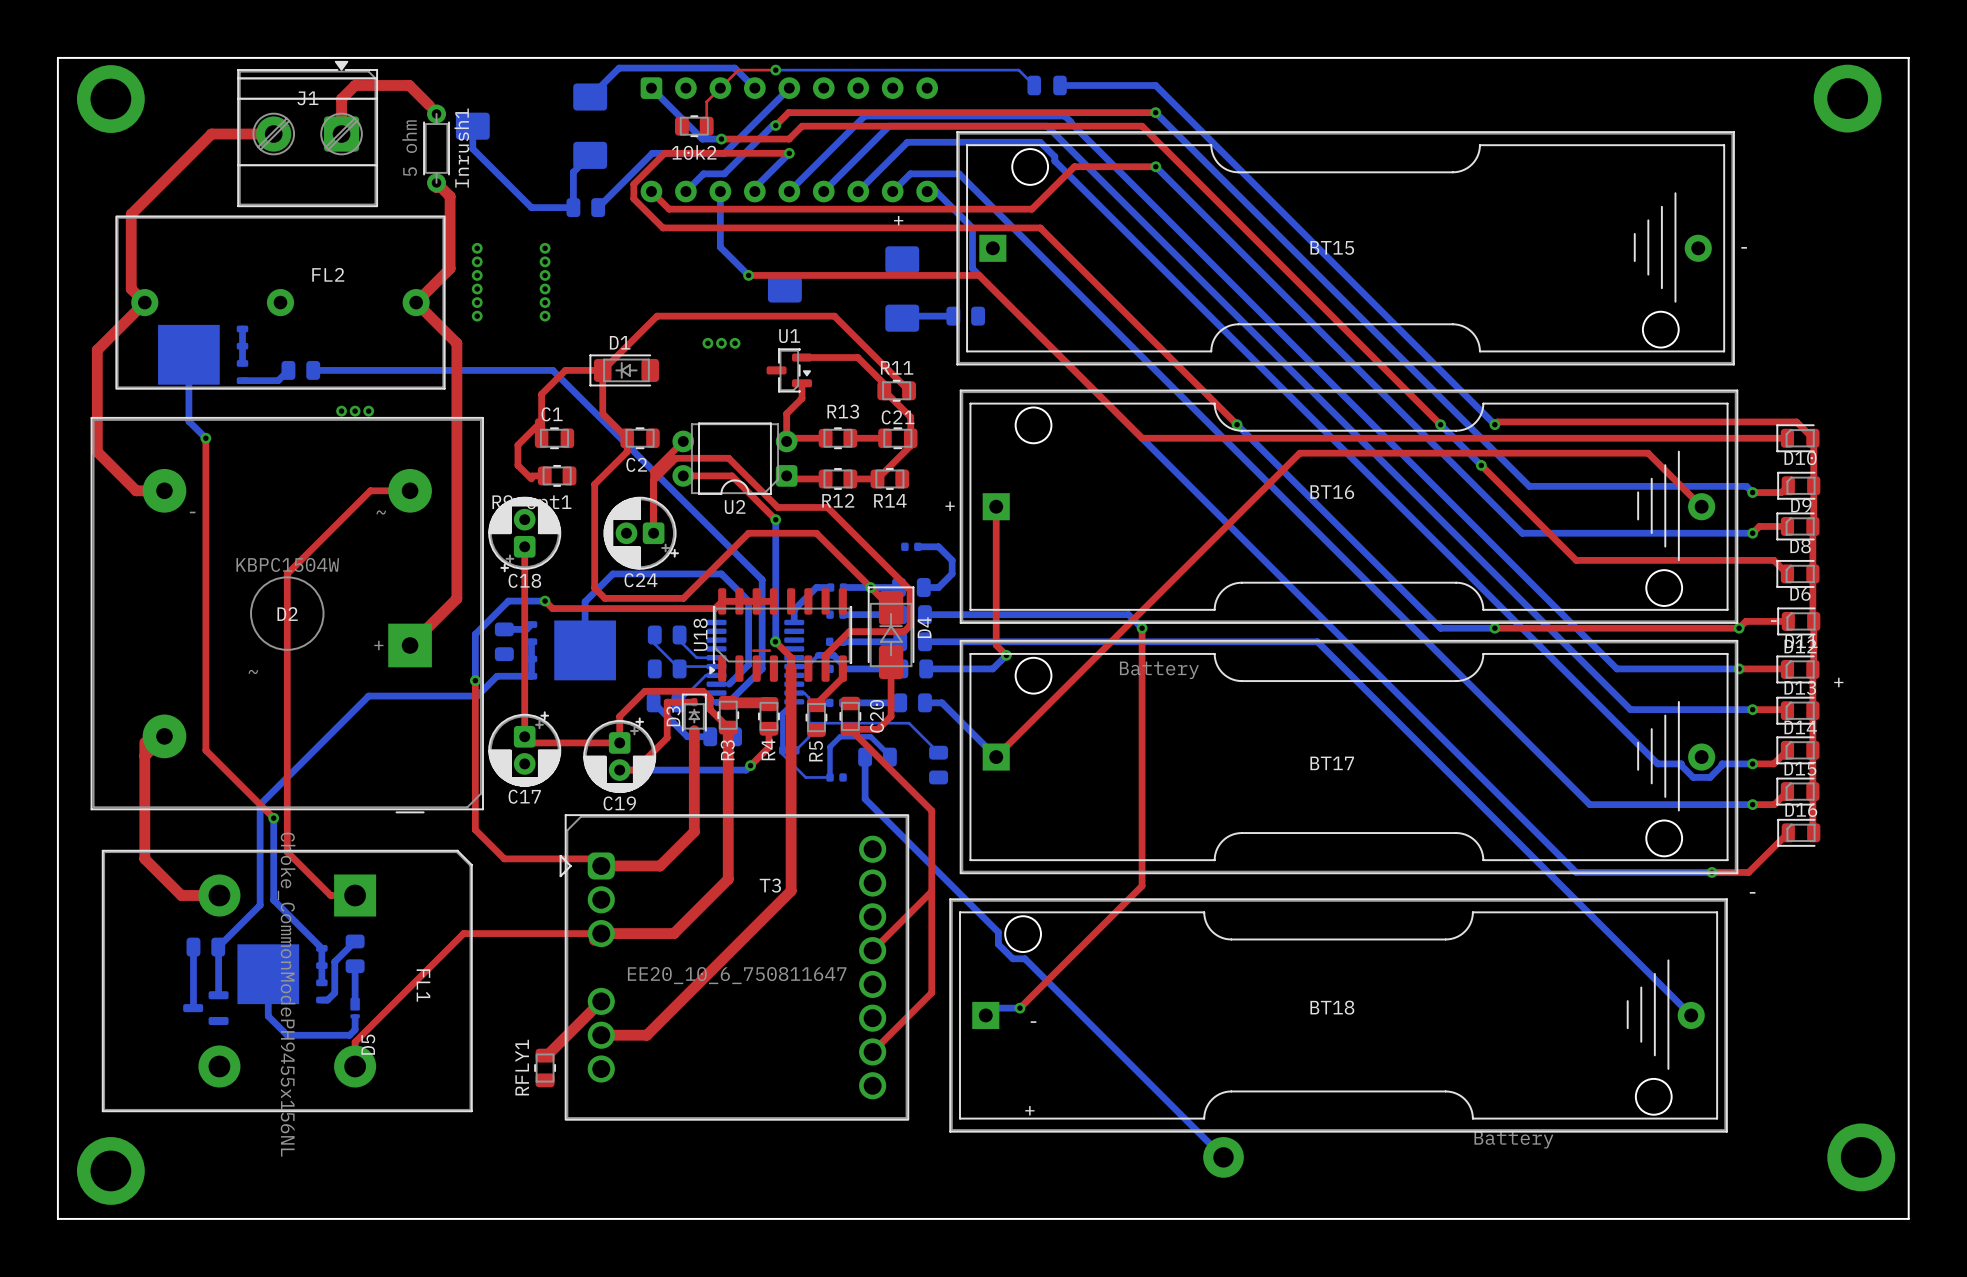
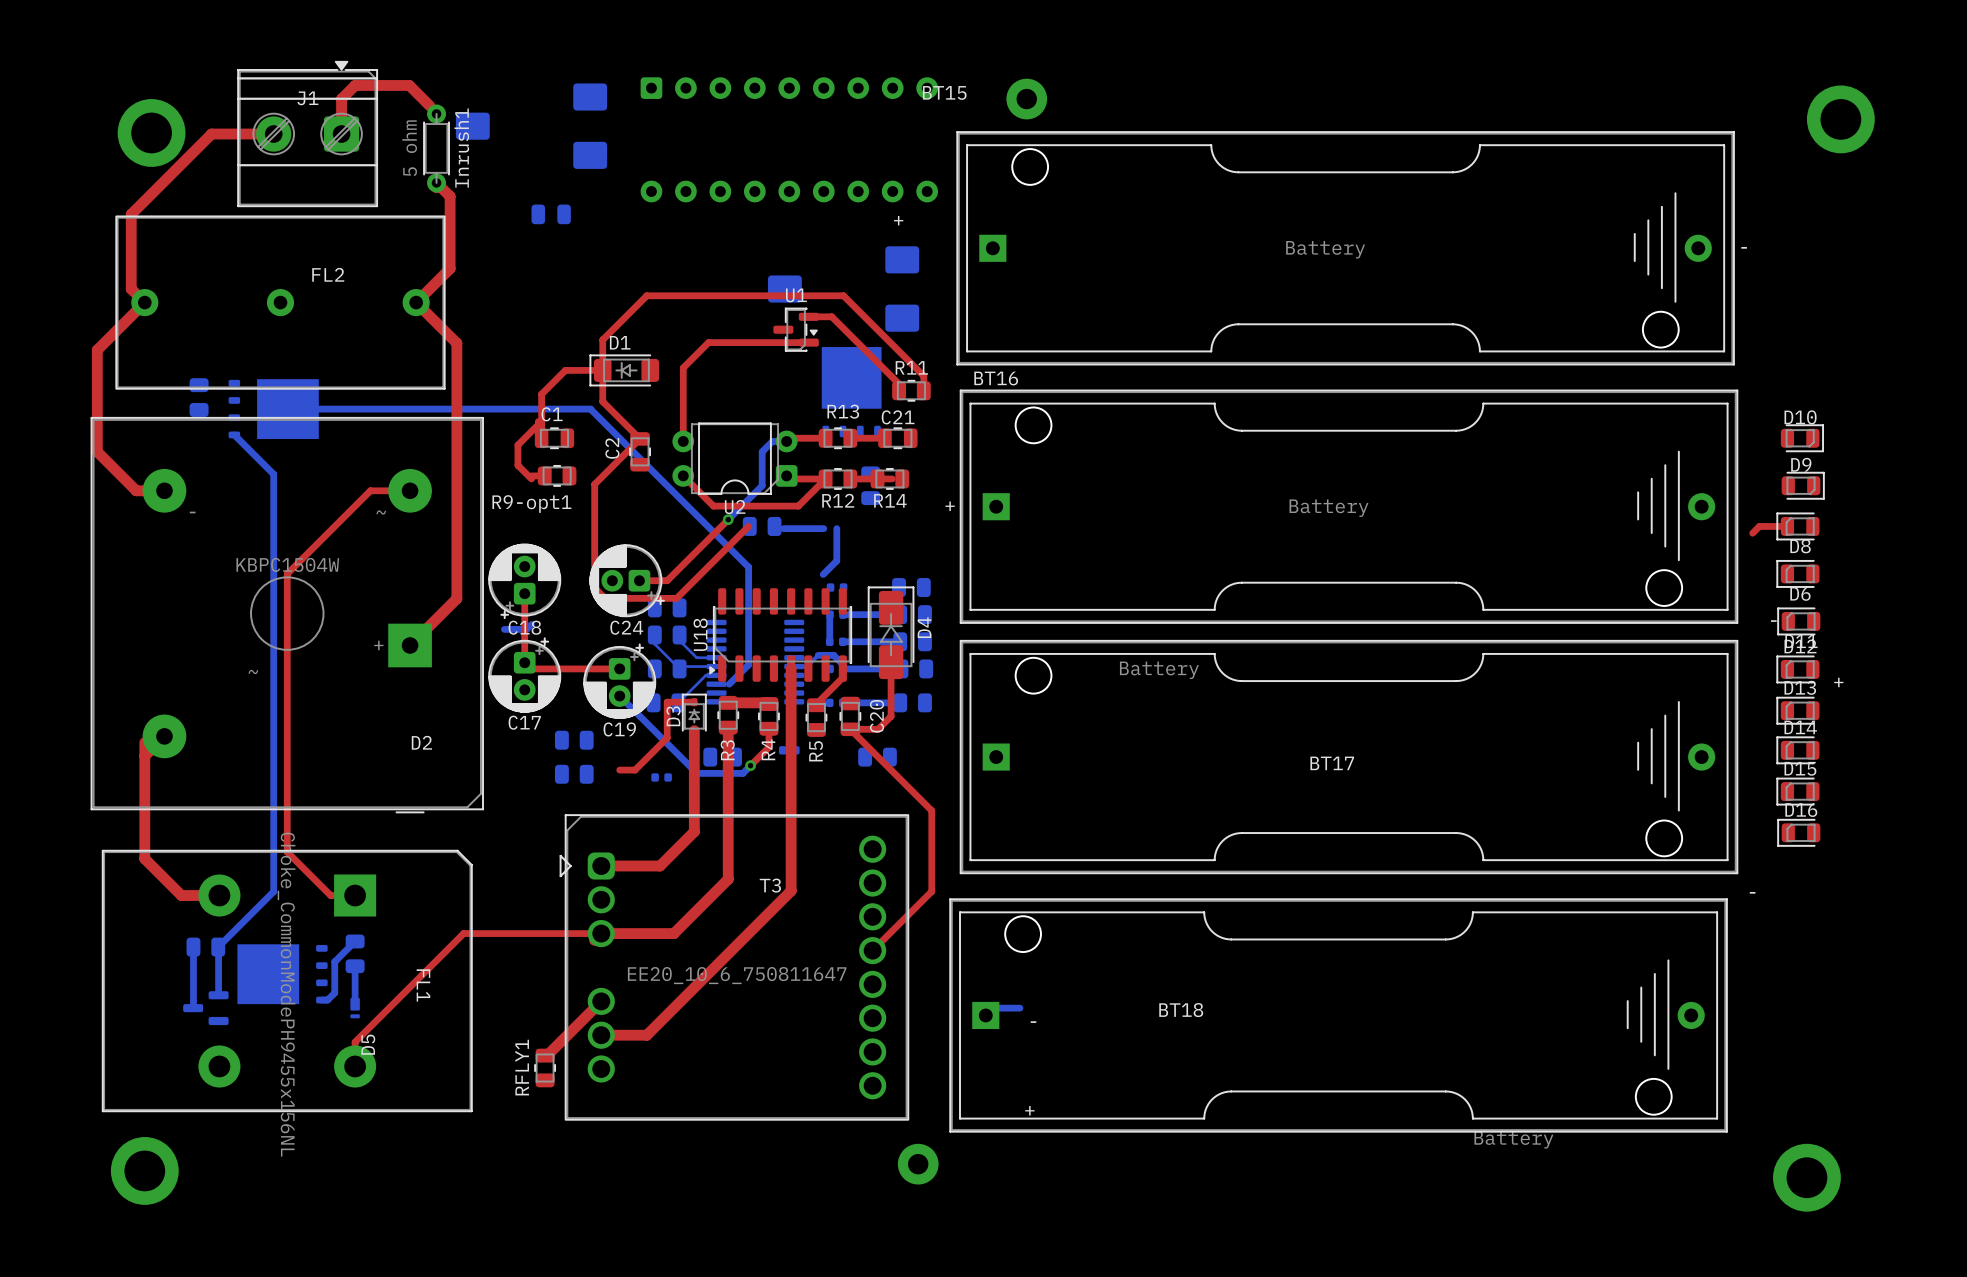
board edge: (57, 57) (1908, 57) (1908, 1218) (57, 1218) (57, 57) -> none
top track: (775, 70) (738, 70) (706, 101) (706, 126) -> none
bottom track: (775, 70) (1018, 70) (1034, 85) -> none
via: (775, 70) -> none
part: (1047, 85) -> none
bottom track: (1060, 85) (1155, 85) (1494, 424) -> none
bottom track: (651, 88) (702, 139) (721, 139) -> none
bottom track: (754, 88) (734, 68) (619, 68) (590, 97) -> none
bottom track: (789, 88) (724, 153) (652, 153) (598, 207) -> none
via position: (1847, 98) -> (1840, 119)
via position: (110, 99) -> (151, 132)
part: none -> (1026, 99)
top track: (1155, 112) (788, 112) (775, 125) -> none
bottom track: (1155, 112) (1529, 486) (1746, 486) (1752, 492) -> none
via: (1155, 112) -> none
bottom track: (775, 125) (772, 125) (724, 173) (703, 173) (685, 191) -> none
via: (775, 125) -> none
bottom track: (472, 126) (472, 148) (531, 207) (573, 207) (573, 172) (590, 155) -> none
10k2: (694, 126) -> none
top track: (721, 139) (789, 139) (802, 126) (1142, 126) (1440, 424) -> none
via: (721, 139) -> none
top track: (789, 153) (664, 153) (633, 184) (633, 198) (662, 227) (1040, 227) (1237, 424) -> none
bottom track: (789, 153) (754, 187) (754, 191) -> none
via: (789, 153) -> none
top track: (1155, 166) (1074, 166) (1031, 209) (669, 209) (651, 191) -> none
bottom track: (1155, 166) (1522, 533) (1752, 533) -> none
via: (1155, 166) -> none
bottom track: (723, 191) (720, 191) (720, 247) (748, 275) -> none
bottom track: (789, 191) (864, 116) (1064, 116) (1616, 668) (1739, 668) -> none
bottom track: (823, 191) (889, 126) (1047, 126) (1630, 709) (1752, 709) -> none
bottom track: (858, 191) (907, 142) (1040, 142) (1054, 156) (1054, 161) (1657, 763) (1681, 763) (1693, 777) (1710, 777) (1722, 763) (1752, 763) -> none
bottom track: (892, 191) (910, 173) (959, 173) (1589, 804) (1752, 804) -> none
bottom track: (927, 191) (936, 191) (972, 227) (972, 268) (1576, 872) (1711, 872) -> none
part: (585, 207) -> none
part: none -> (551, 214)
BT15 name position: BT15 (1332, 247) -> BT15 (944, 92)
via: (477, 248) -> none
via: (545, 248) -> none
BT15 value: none -> Battery (1325, 249)
via: (477, 261) -> none
via: (545, 261) -> none
via: (477, 275) -> none
via: (545, 275) -> none
top track: (748, 275) (979, 275) (1142, 438) (1787, 438) -> none
via: (748, 275) -> none
via: (477, 289) -> none
via: (545, 289) -> none
via: (477, 302) -> none
via: (545, 302) -> none
via: (477, 316) -> none
via: (545, 316) -> none
top track: none -> (808, 316) (831, 316) (899, 383) (899, 390)
bottom track: (953, 316) (904, 316) (902, 318) -> none
part: (965, 316) -> none
bottom track: (242, 328) (242, 363) -> none
top track: none -> (808, 342) (708, 342) (683, 367) (683, 441)
via: (707, 343) -> none
via: (721, 343) -> none
via: (735, 343) -> none
bottom track: (188, 354) (188, 421) (205, 438) -> none
part rotation: 0° (203, 354) -> 180° (273, 409)
part position: (203, 354) -> (273, 409)
top track: (802, 357) (857, 357) (884, 383) (884, 390) (910, 417) (910, 445) (877, 478) -> (892, 478) (877, 478)
bottom track: (288, 370) (278, 380) (242, 380) -> none
part rotation: 0° (300, 370) -> 90° clockwise (199, 397)
part position: (300, 370) -> (199, 397)
bottom track: (313, 370) (552, 370) (762, 579) (762, 668) (728, 702) (716, 702) -> none
top track: (602, 370) (657, 316) (834, 316) (912, 393) -> (602, 370) (602, 339) (646, 295) (843, 295) (923, 376) (923, 390) (926, 393)
U1 position: (789, 370) -> (796, 329)
top track: (802, 383) (802, 398) (786, 413) (786, 441) -> none
R11 position: (896, 390) -> (911, 390)
part: none -> (851, 392)
top track: (602, 401) (602, 413) (627, 438) (627, 451) -> (602, 401) (640, 438) (627, 451)
via: (341, 411) -> none
via: (355, 411) -> none
via: (368, 411) -> none
bottom track: (1237, 424) (1440, 628) (1494, 628) -> none
via: (1237, 424) -> none
bottom track: (1440, 424) (1481, 465) -> none
via: (1440, 424) -> none
top track: (1494, 424) (1497, 421) (1796, 421) (1813, 439) (1813, 832) -> none
via: (1494, 424) -> none
bottom track: none -> (234, 434) (273, 474) (273, 818)
top track: (205, 438) (205, 750) (273, 818) -> none
via: (205, 438) -> none
C2 rotation: 0° (640, 438) -> 90° clockwise (640, 451)
D10 rotation: 0° (1797, 438) -> 180° (1802, 438)
bottom track: none -> (786, 441) (772, 441) (762, 451) (762, 485) (728, 519)
top track: (676, 448) (653, 471) (653, 533) -> none
top track: (1481, 465) (1576, 560) (1773, 560) (1787, 573) -> none
via: (1481, 465) -> none
top track: (683, 475) (731, 475) (775, 519) -> (683, 475) (713, 506) (798, 506) (825, 478)
top track: (653, 480) (675, 458) (728, 458) (777, 507) (827, 507) (910, 589) (910, 625) (904, 631) (849, 631) (825, 655) (825, 668) -> none
part: none -> (870, 485)
top track: (1788, 485) (1781, 492) (1752, 492) -> none
D9 rotation: 0° (1798, 485) -> 180° (1803, 485)
BT16 name position: BT16 (1332, 492) -> BT16 (996, 378)
via: (1752, 492) -> none
top track: (992, 506) (996, 506) (996, 645) (1006, 655) -> none
top track: (1701, 506) (1648, 453) (1299, 453) (996, 756) -> none
BT16 value: none -> Battery (1328, 508)
top track: none -> (728, 519) (667, 580) (639, 580)
bottom track: (775, 519) (775, 641) -> none
via position: (775, 519) -> (728, 519)
part: none -> (762, 526)
bottom track: none -> (783, 528) (823, 528)
bottom track: none -> (836, 528) (836, 560) (823, 574)
C24 position: (641, 533) -> (627, 580)
via: (1752, 533) -> none
C18 position: (524, 534) -> (524, 581)
top track: (524, 546) (524, 593) -> none
part: (911, 546) -> none
bottom track: (917, 546) (938, 546) (952, 560) (952, 573) (938, 587) (923, 587) -> none
bottom track: (830, 587) (816, 587) (794, 609) (794, 621) -> none
bottom track: (843, 587) (899, 587) -> none
via: (870, 587) -> none
top track: (676, 598) (683, 598) (748, 533) (816, 533) (891, 607) -> (676, 598) (748, 526)
top track: (545, 601) (552, 608) (715, 608) (722, 601) (773, 601) -> none
bottom track: (545, 601) (508, 601) (475, 634) (475, 680) -> none
via: (545, 601) -> none
bottom track: (748, 601) (721, 573) (612, 573) (585, 601) (585, 650) -> (748, 601) (748, 567) (590, 409) (287, 409)
part: none -> (667, 607)
D2 name position: D2 (287, 614) -> D2 (421, 742)
bottom track: none -> (829, 614) (829, 641)
bottom track: (924, 614) (1128, 614) (1142, 628) -> none
top track: (1788, 621) (1745, 621) (1739, 628) (1494, 628) -> none
top track: (1142, 628) (1142, 886) (1019, 1008) -> none
via: (1142, 628) -> none
via: (1494, 628) -> none
via: (1739, 628) -> none
part: (504, 641) -> none
bottom track: (531, 641) (531, 676) (497, 676) (477, 696) (368, 696) (260, 804) (260, 905) -> none
top track: (775, 641) (791, 657) (791, 668) -> none
via: (775, 641) -> none
bottom track: (924, 641) (1317, 641) (1691, 1015) -> none
part: (570, 650) -> none
top track: (753, 650) (769, 650) -> none
bottom track: (1006, 655) (992, 668) (926, 668) -> none
via: (1006, 655) -> none
top track: (524, 662) (524, 736) (530, 742) (619, 742) (619, 716) (644, 691) (703, 691) (710, 698) (710, 709) (728, 727) -> (524, 662) (530, 668) (619, 668)
top track: (1739, 668) (1787, 669) -> none
via: (1739, 668) -> none
top track: (475, 680) (475, 829) (504, 858) (594, 858) (601, 866) -> none
via: (475, 680) -> none
bottom track: (794, 693) (804, 693) (808, 697) (808, 737) (795, 750) -> none
bottom track: (794, 701) (782, 713) (782, 754) (805, 777) (830, 777) (830, 746) (840, 736) (870, 736) (889, 757) -> none
bottom track: (653, 702) (687, 736) (710, 736) -> none
bottom track: (924, 702) (942, 702) (996, 757) -> none
top track: (1752, 709) (1787, 710) -> none
via: (1752, 709) -> none
bottom track: (808, 723) (909, 723) (938, 752) -> none
part position: (722, 736) -> (722, 757)
part: none -> (574, 740)
C17 position: (524, 749) -> (524, 675)
top track: (1787, 750) (1773, 763) (1752, 763) -> none
C19 position: (619, 755) -> (619, 681)
bottom track: (865, 757) (865, 799) (998, 932) (998, 944) (1012, 958) (1024, 958) (1223, 1157) -> none
via: (1752, 763) -> none
bottom track: (750, 765) (746, 770) (619, 770) -> (750, 765) (742, 773) (697, 773) (619, 696)
part: (938, 765) -> none
part: none -> (574, 774)
part: none -> (661, 777)
part: (836, 777) -> none
top track: (1787, 791) (1774, 804) (1752, 804) -> none
via: (1752, 804) -> none
via: (273, 818) -> none
top track: (1788, 832) (1748, 872) (1711, 872) -> none
via: (1711, 872) -> none
bottom track: (273, 891) (273, 900) (321, 948) (321, 982) -> (273, 891) (260, 905)
top track: (931, 891) (931, 992) (872, 1051) -> none
bottom track: (268, 974) (268, 1016) (287, 1035) (349, 1035) (355, 1029) (355, 1017) -> none
BT18 name position: BT18 (1332, 1007) -> BT18 (1181, 1010)
via: (1019, 1008) -> none
part position: (1223, 1157) -> (918, 1164)
via position: (1861, 1157) -> (1806, 1177)
via position: (110, 1170) -> (144, 1170)

